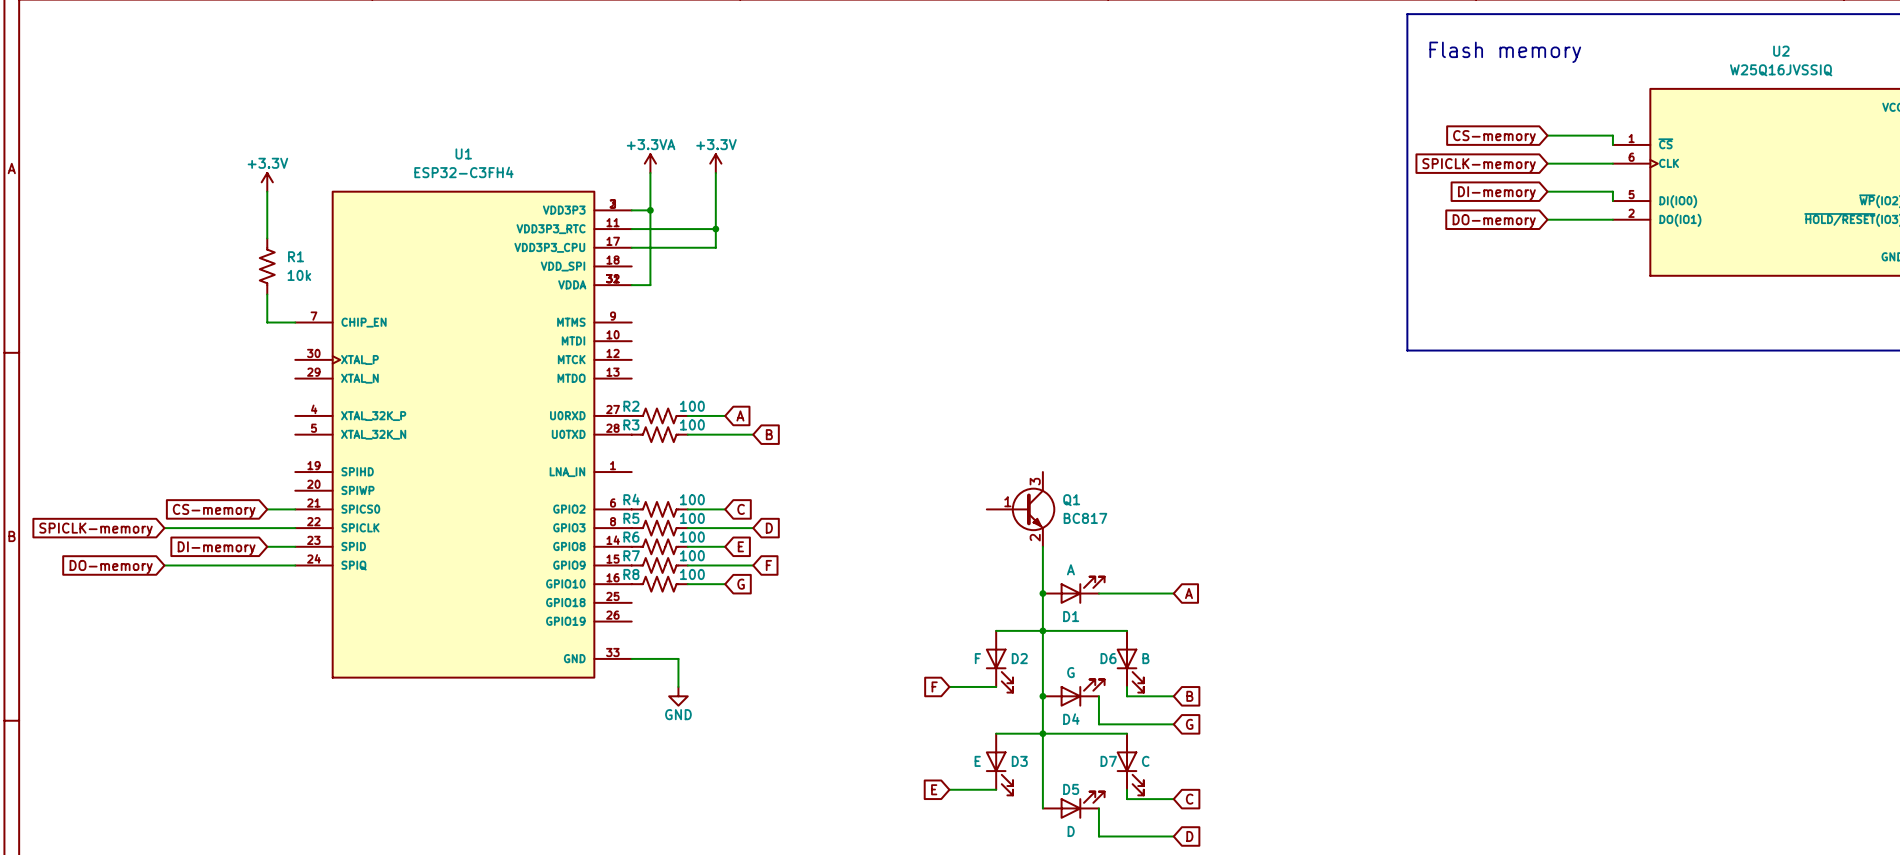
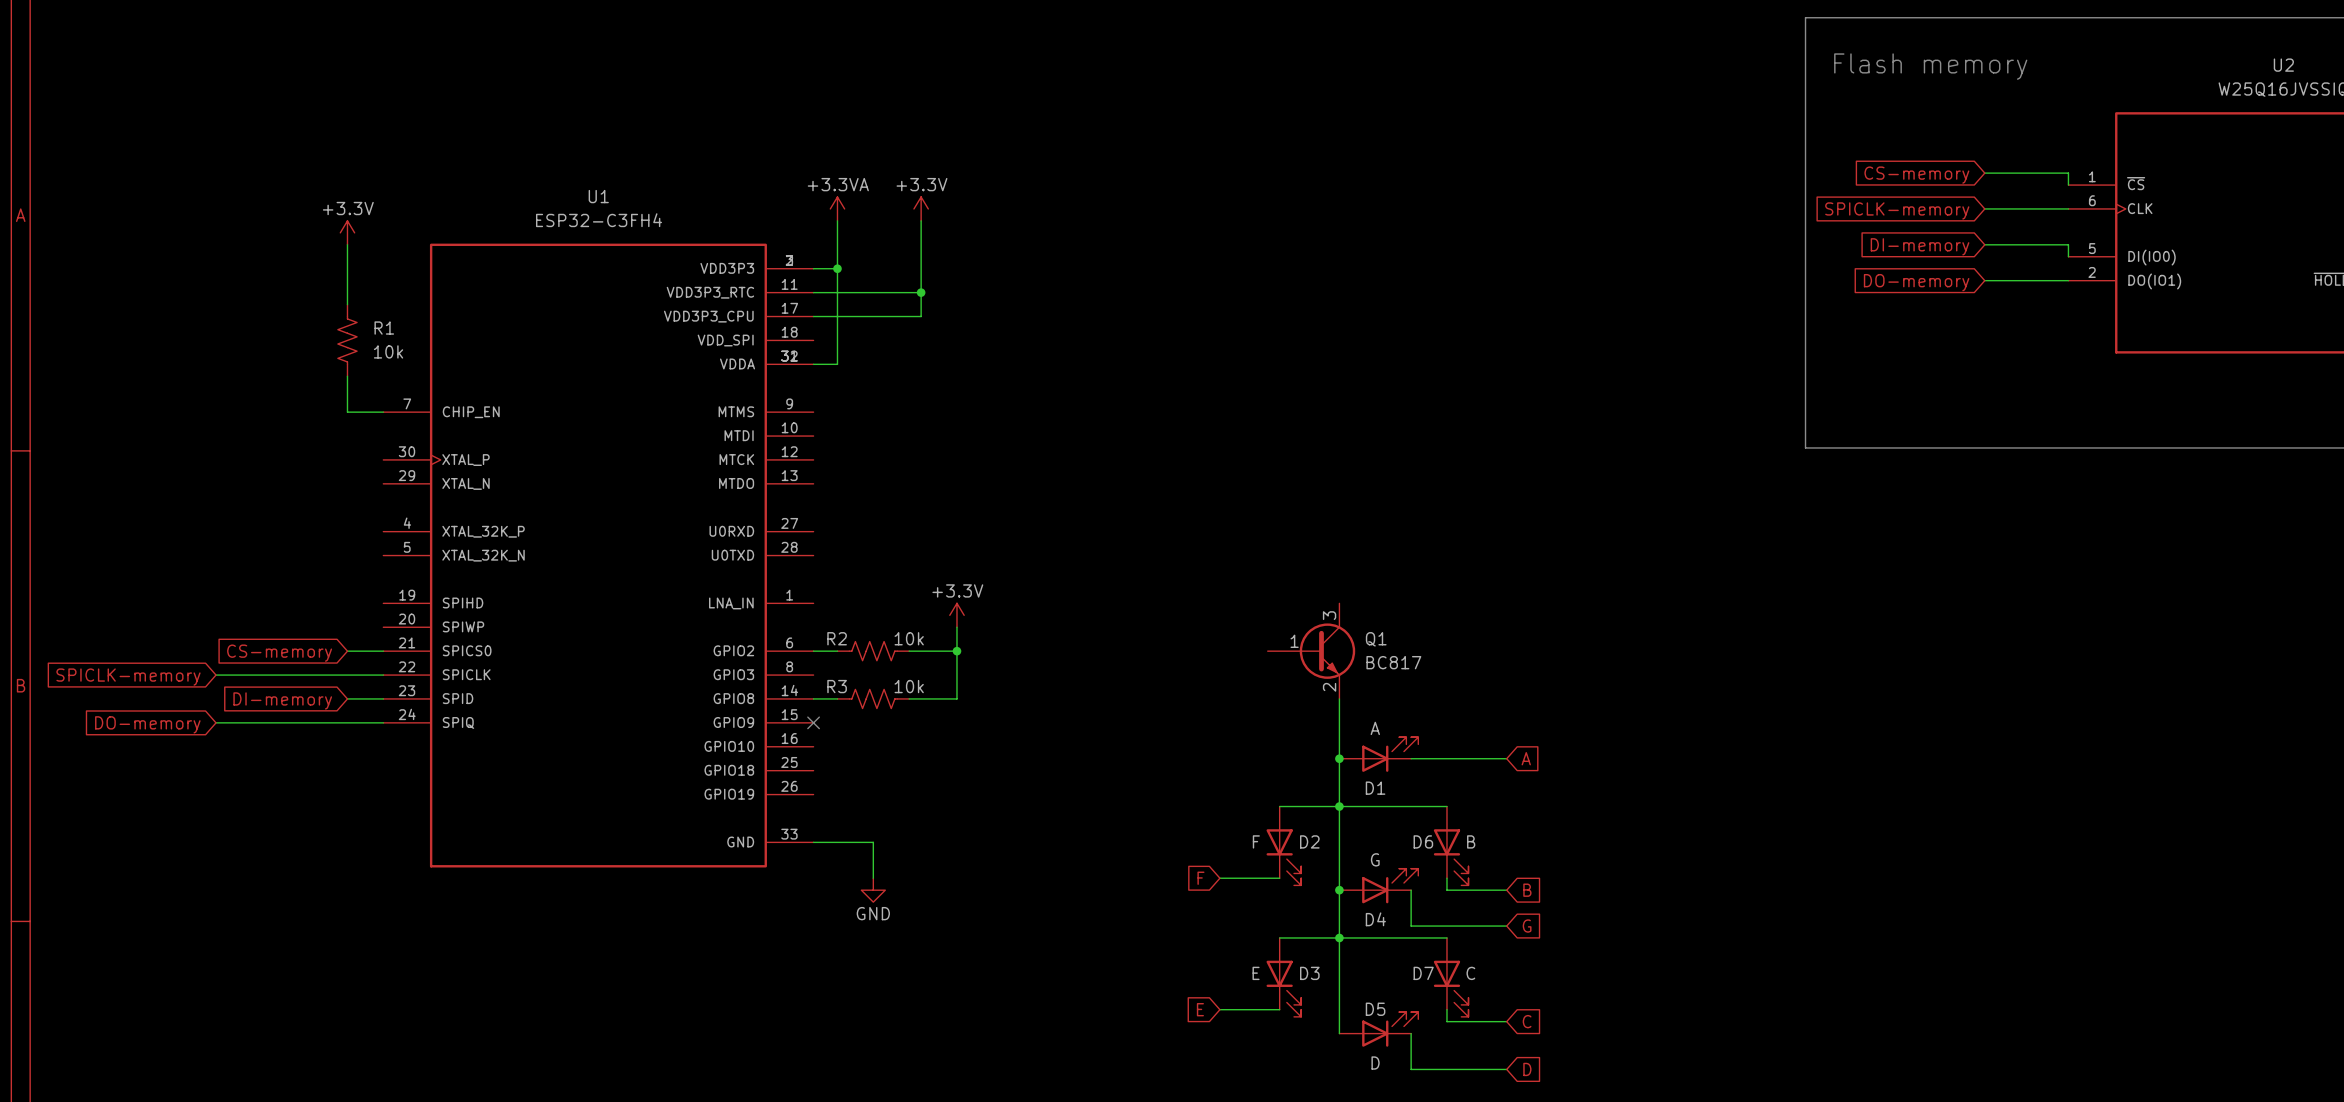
R2 value: 100 (692, 406) -> 10k (909, 638)
R2 position: (659, 415) -> (873, 651)
wire: (687, 415) (725, 415) -> none
global label: A (740, 415) -> none
R3 value: 100 (692, 424) -> 10k (909, 686)
R3 position: (659, 434) -> (873, 698)
wire: (687, 434) (753, 434) -> none
global label: B (769, 434) -> none
power symbol: none -> +3.3V (956, 615)
wire: none -> (956, 627) (956, 698) (933, 698)
R4: 100 (659, 509) -> none
wire: none -> (933, 651) (956, 651)
global label: C (741, 509) -> none
junction: none -> (956, 651)
R5: 100 (659, 528) -> none
wire: (687, 528) (753, 528) -> none
global label: D (769, 528) -> none
R6: 100 (659, 546) -> none
global label: E (740, 546) -> none
no-connect mark: none -> (813, 722)
R7: 100 (659, 565) -> none
wire: (687, 565) (753, 565) -> none
global label: F (768, 565) -> none
R8: 100 (659, 584) -> none
wire: (687, 584) (725, 584) -> none
global label: G (741, 584) -> none

